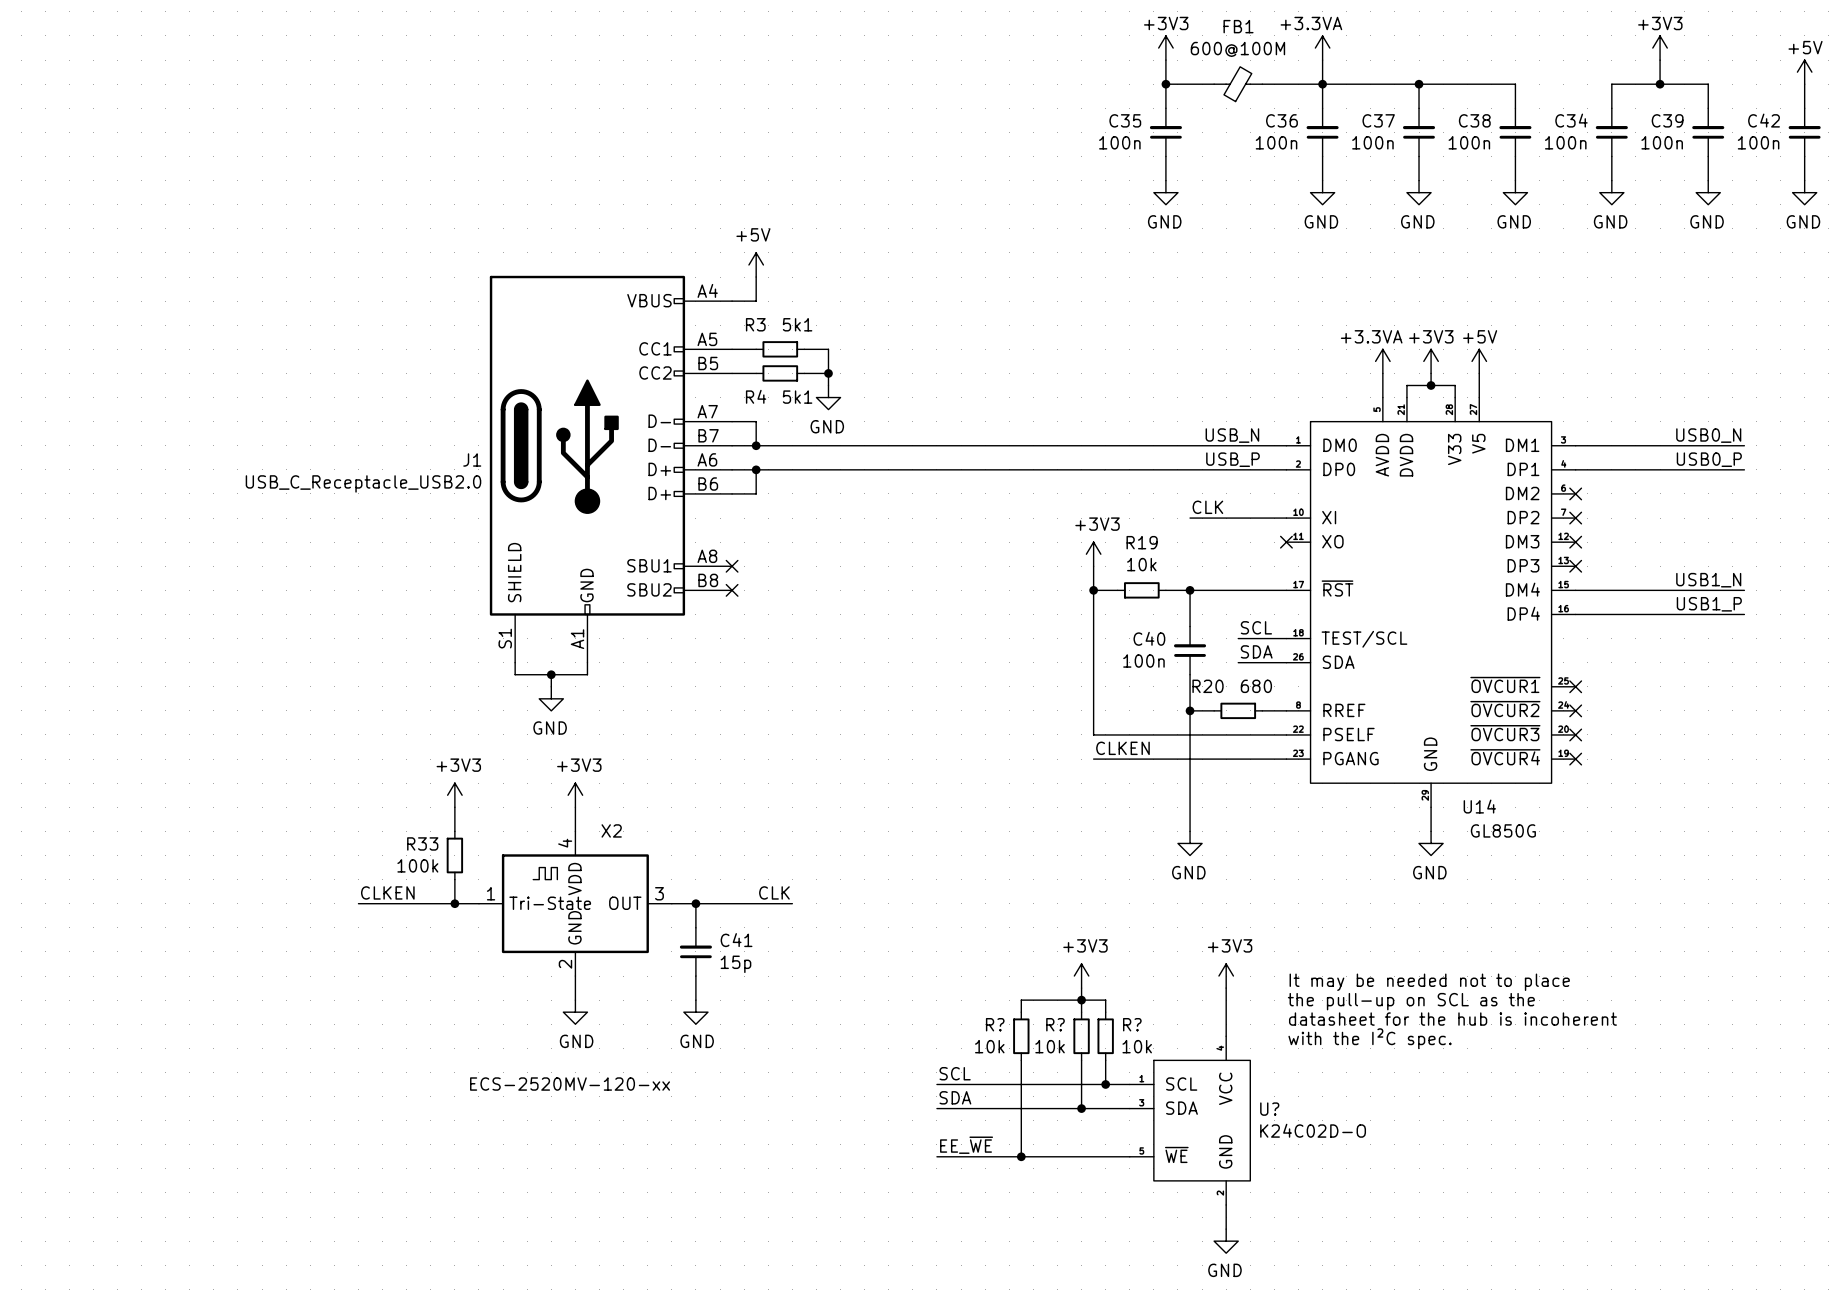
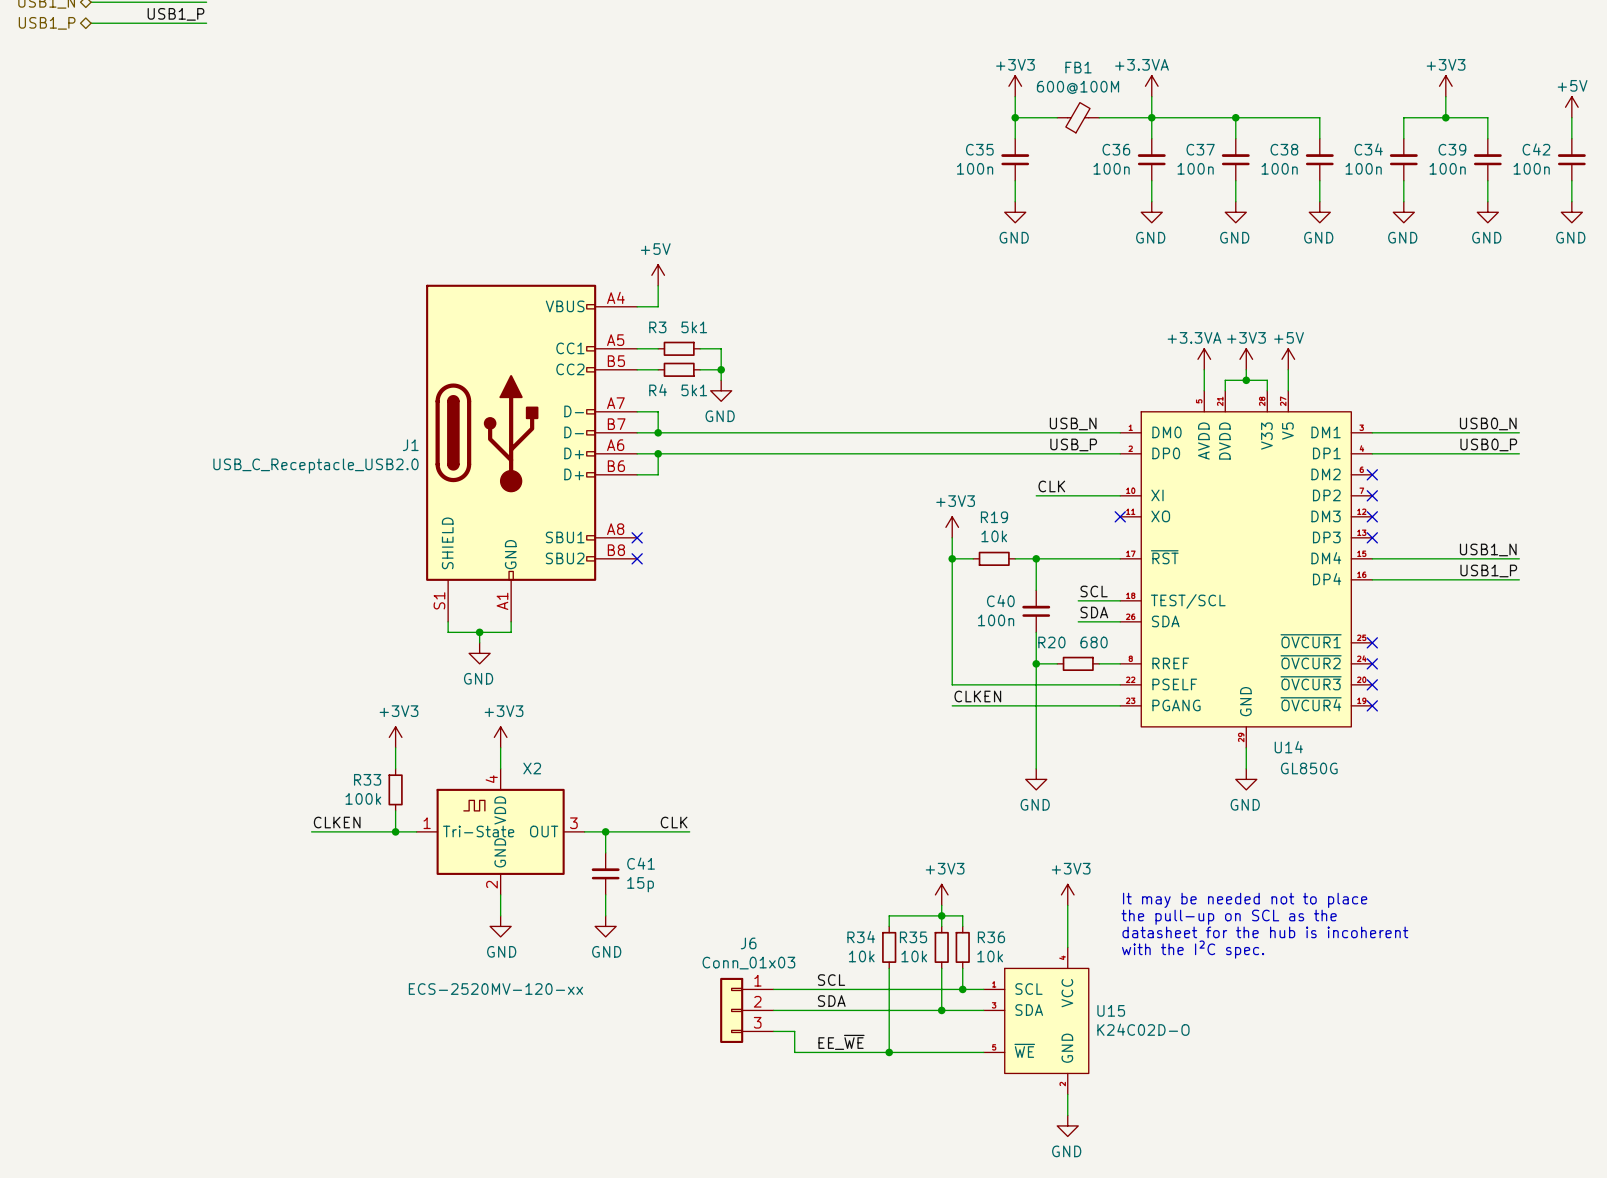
R? name: R? (995, 1024) -> R34 (861, 937)
R? name: R? (1055, 1024) -> R35 (913, 937)
R? name: R? (1132, 1024) -> R36 (991, 937)
wire: none -> (773, 989) (815, 989)
J6: none -> Conn_01x03 (746, 1010)
wire: none -> (773, 1010) (815, 1010)
U? name: U? (1269, 1109) -> U15 (1111, 1010)
wire: none -> (773, 1031) (794, 1031) (794, 1052) (815, 1052)

